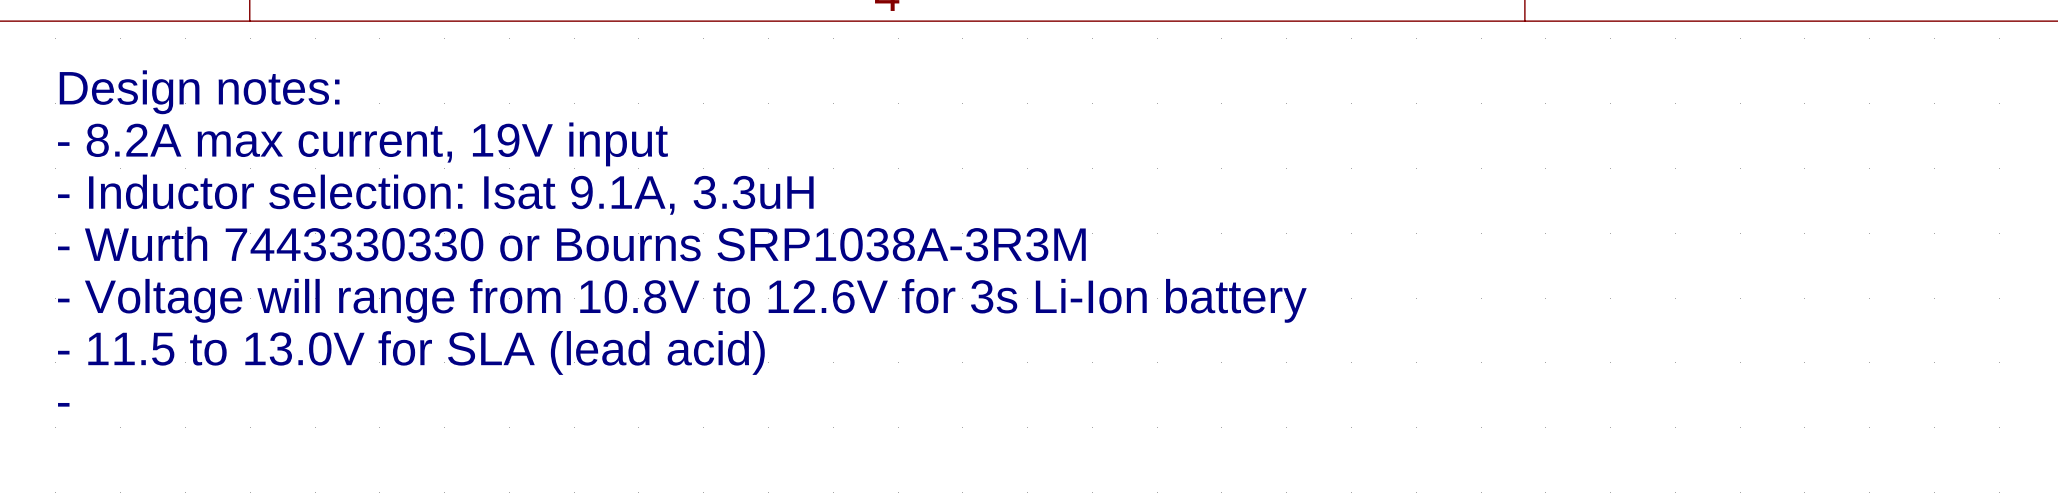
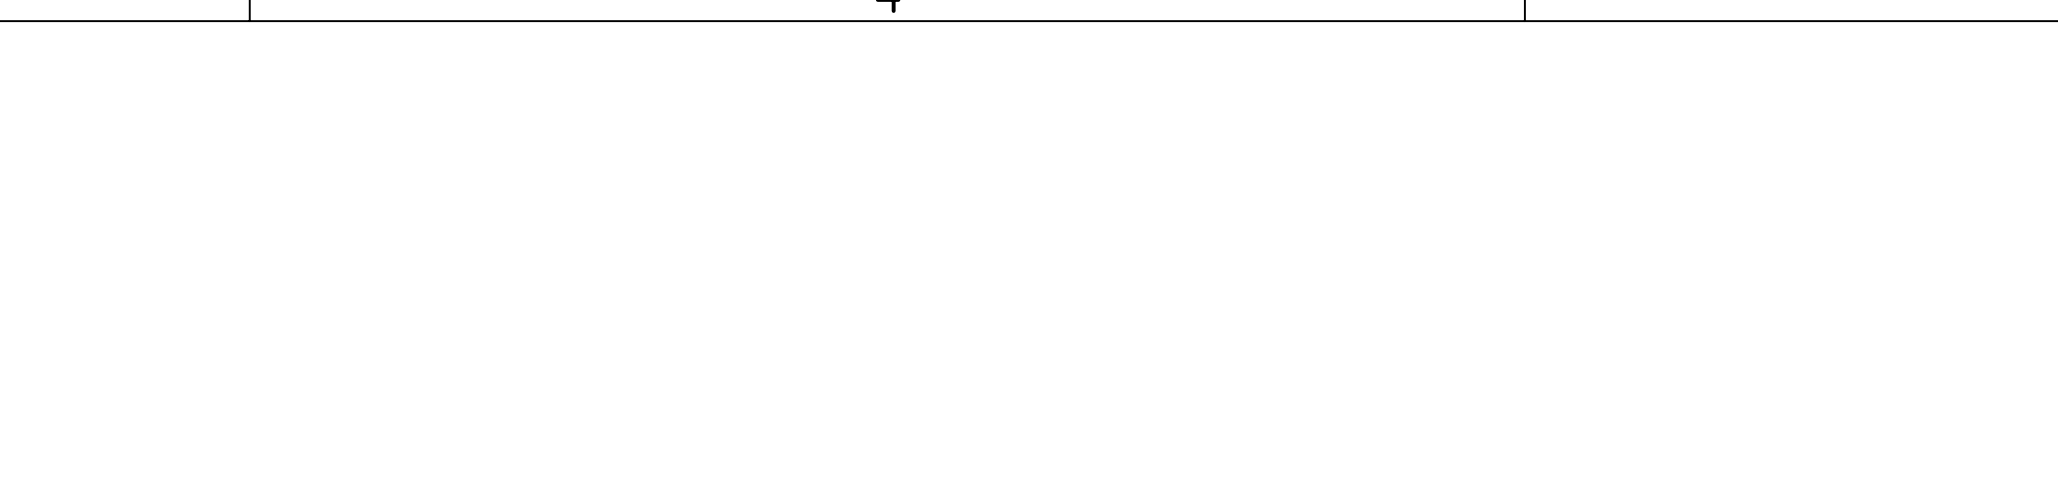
text: Design notes: (199, 92) -> none
text: - 8.2A max current, 19V input (362, 144) -> none
text: - Inductor selection: Isat 9.1A, 3.3uH (435, 194) -> none
text: - Wurth 7443330330 or Bourns SRP1038A-3R3M (571, 244) -> none
text: - Voltage will range from 10.8V to 12.6V for 3s Li-Ion battery (682, 300) -> none
text: - 11.5 to 13.0V for SLA (lead acid) (411, 352) -> none
text: - (63, 404) -> none

